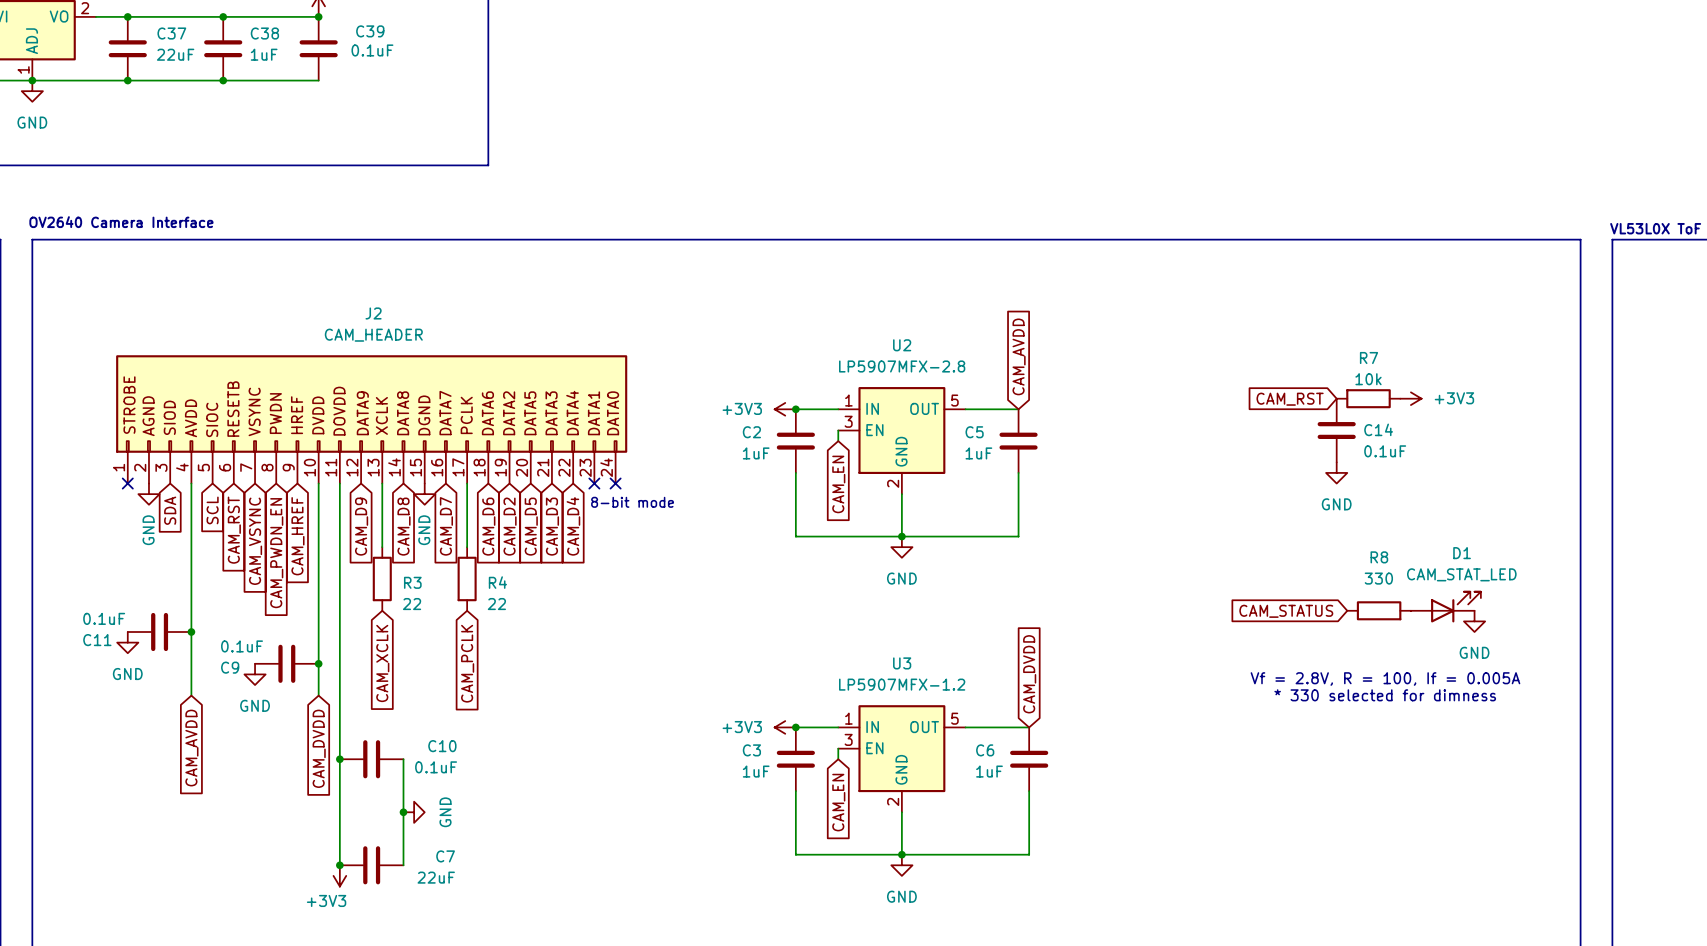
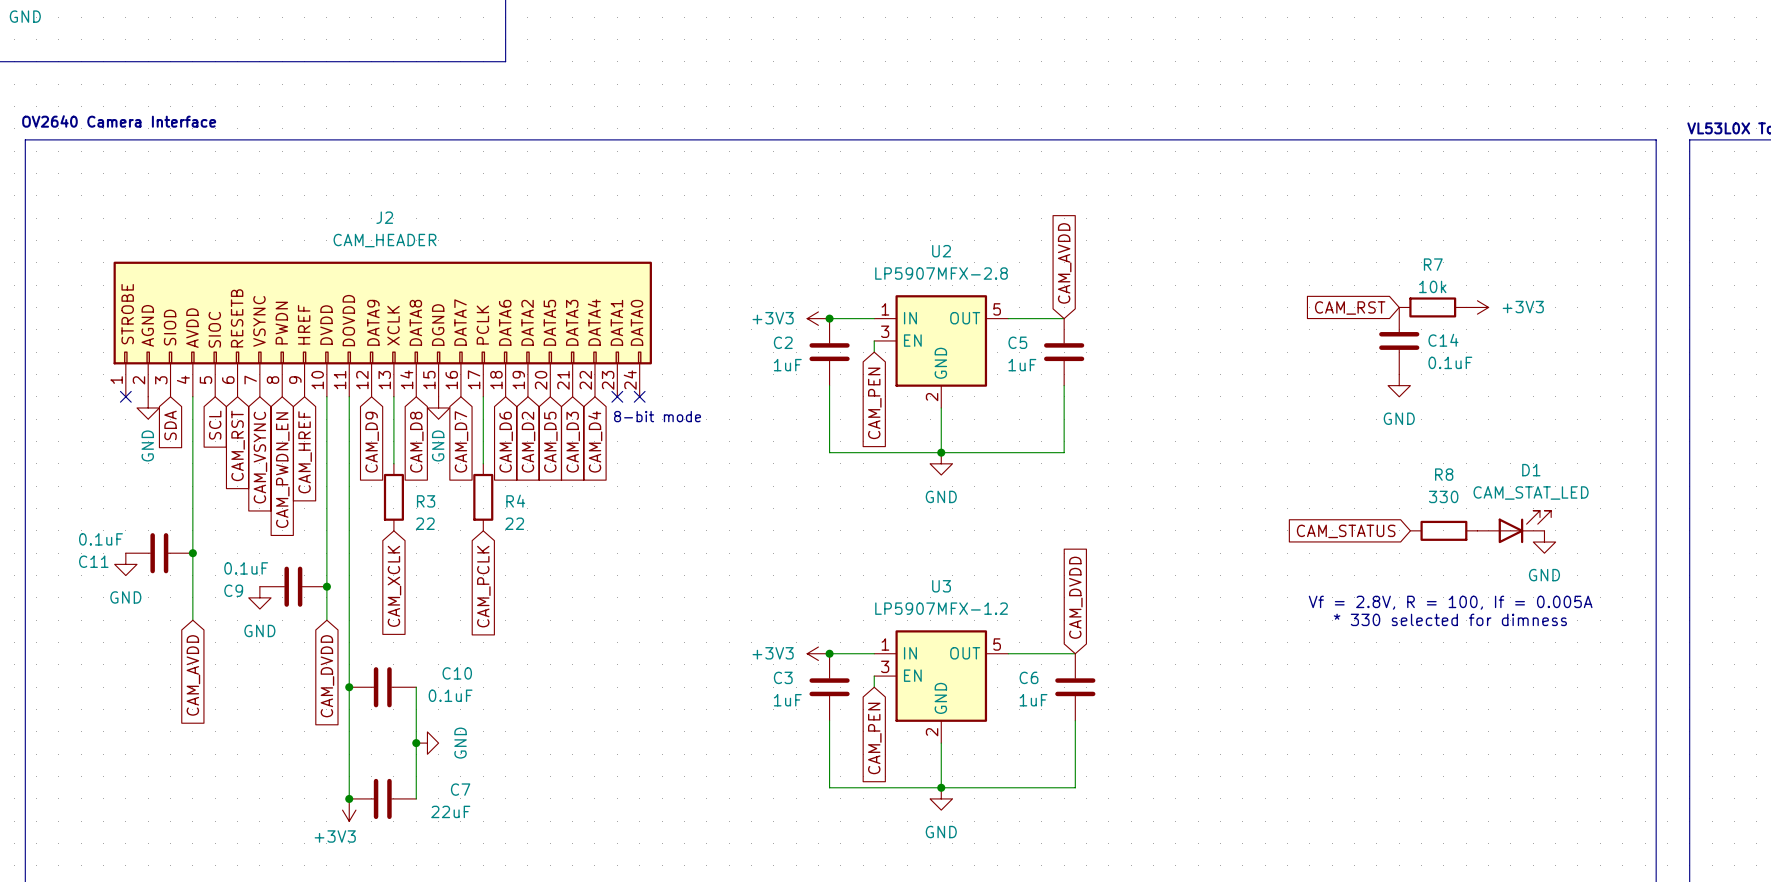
global label: CAM_EN (838, 484) -> CAM_PEN (874, 403)
global label: CAM_EN (838, 802) -> CAM_PEN (874, 738)

